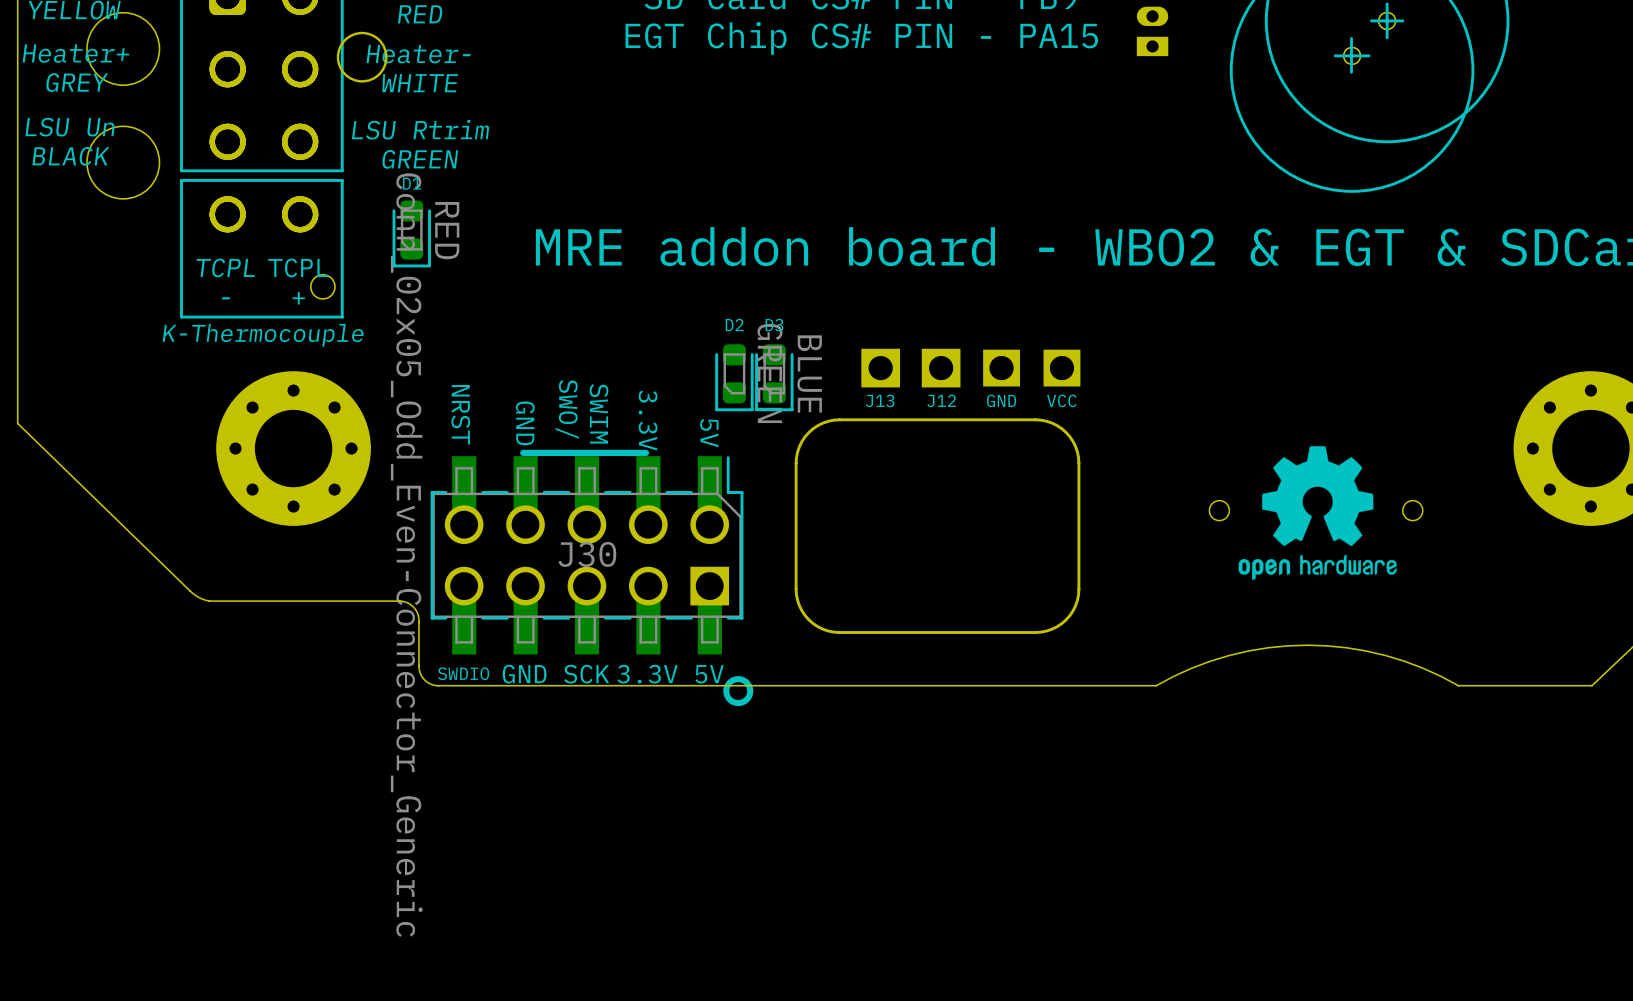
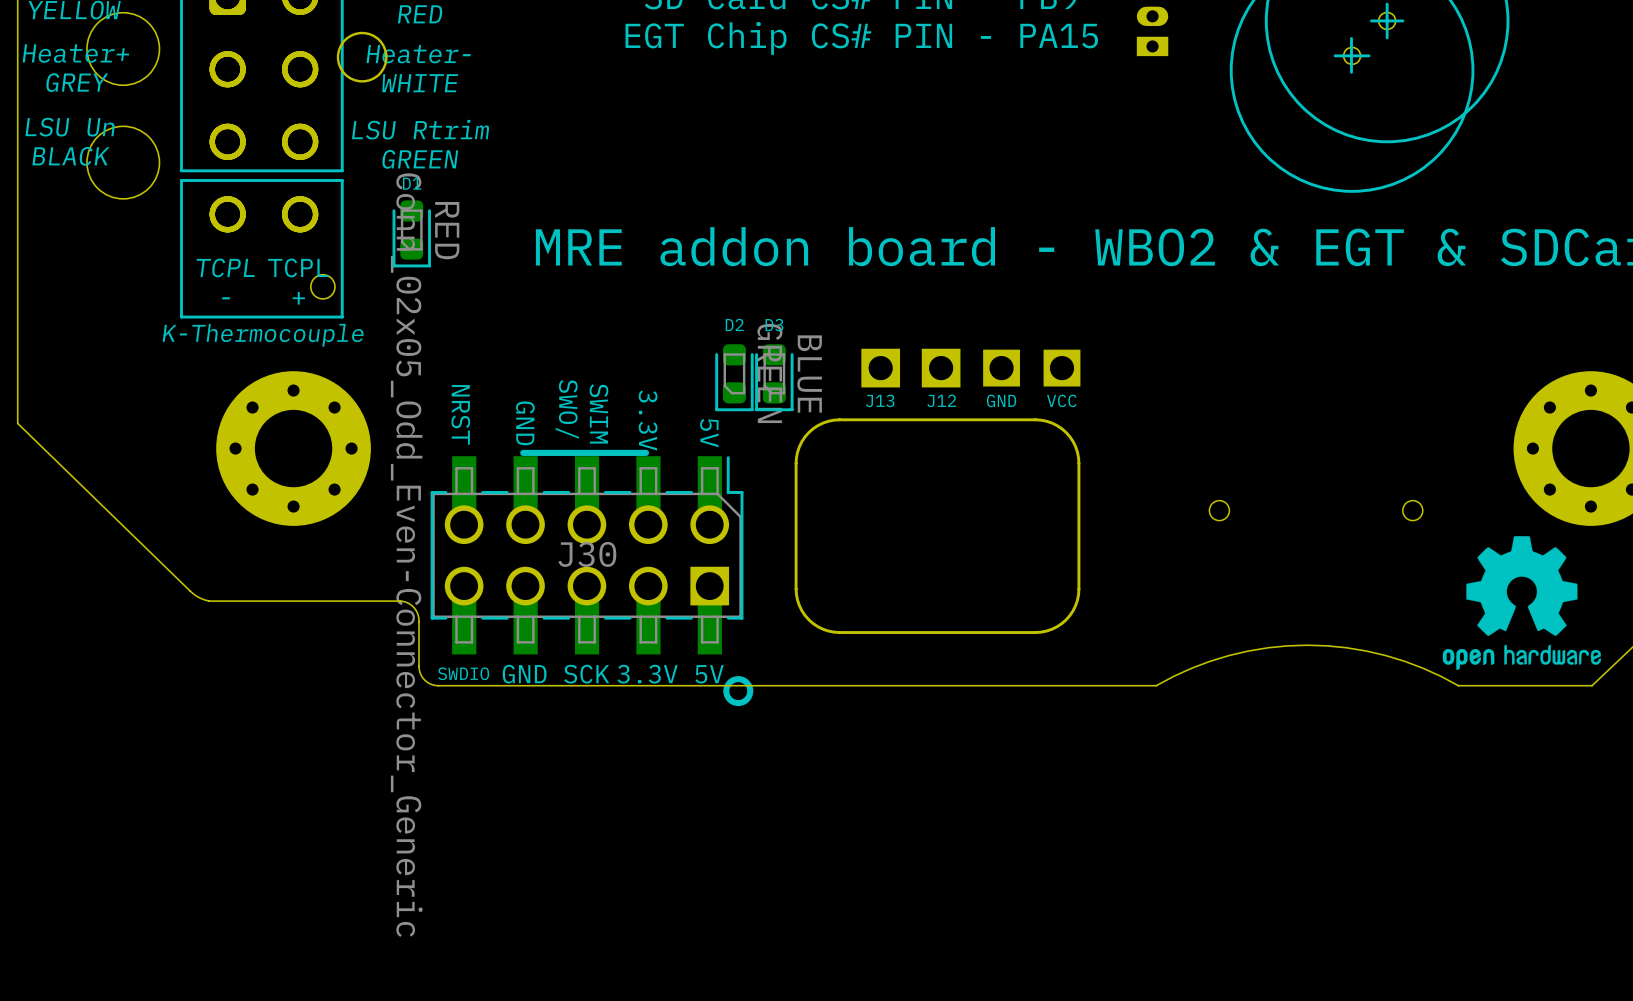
drawing position: (1317, 513) -> (1521, 603)

